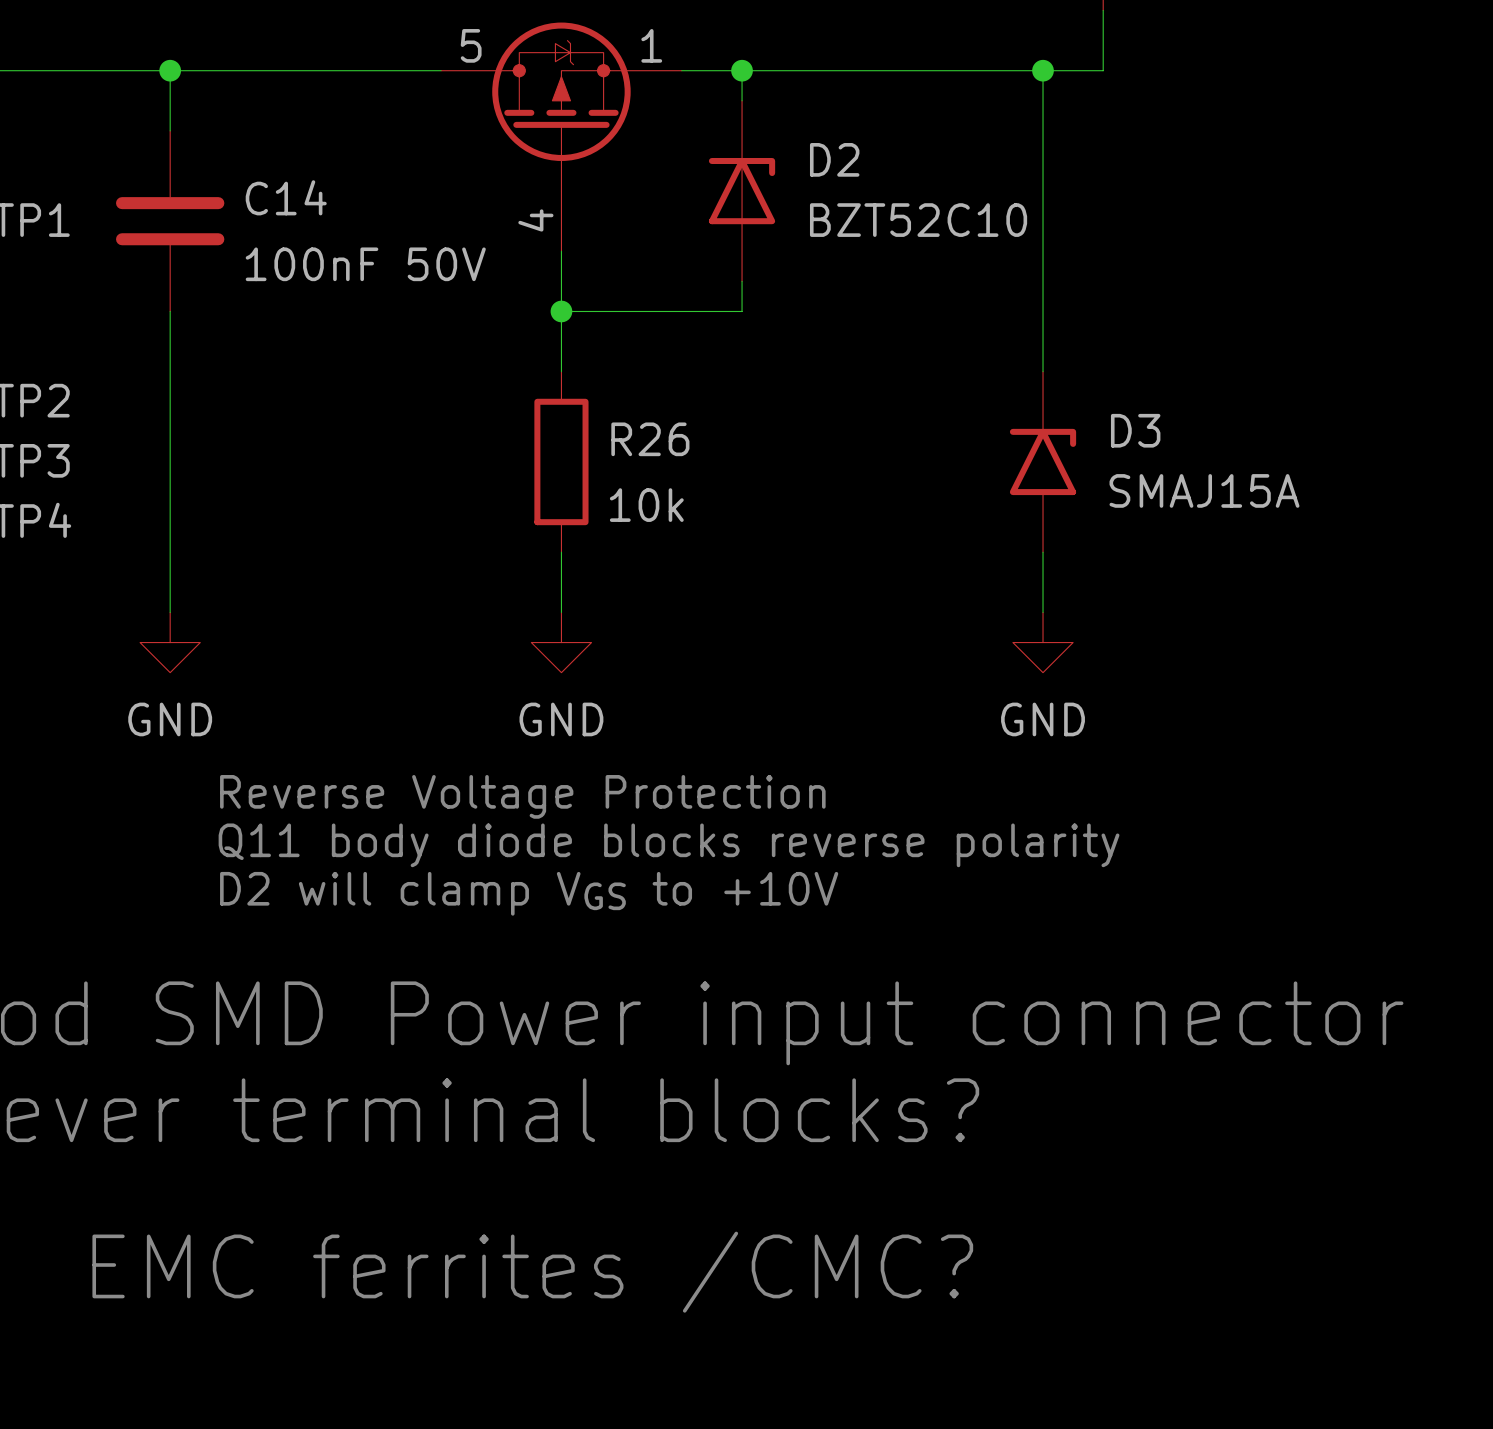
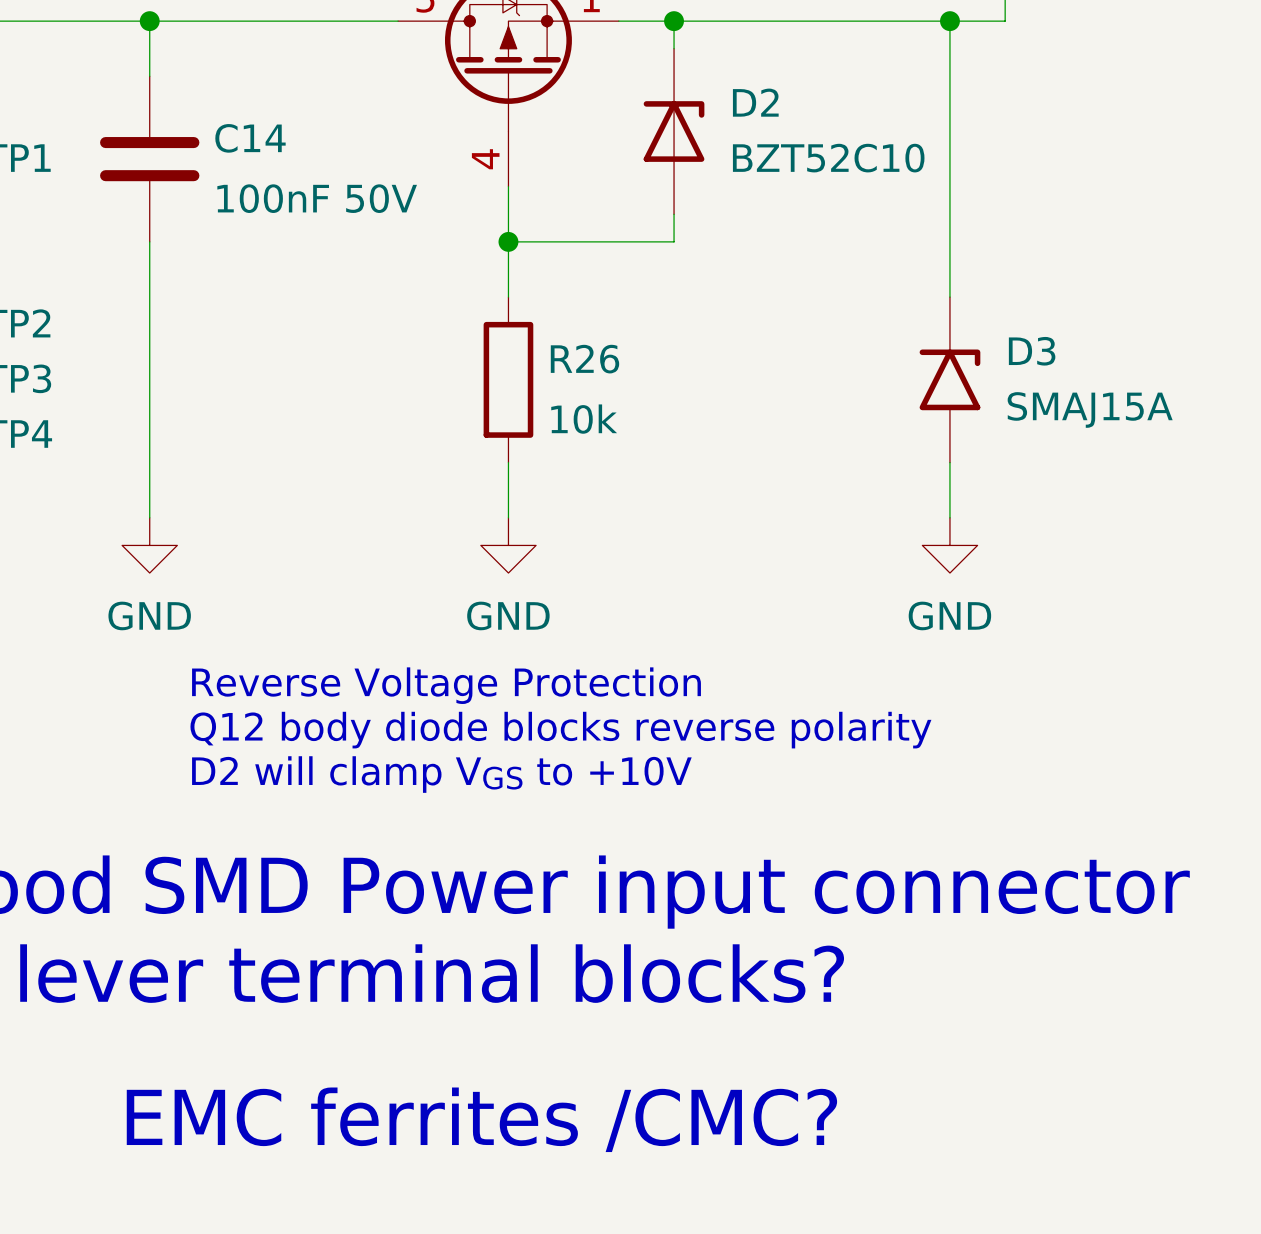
text: Q11 body diode blocks reverse polarity (669, 845) -> Q12 body diode blocks reverse polarity (560, 730)

